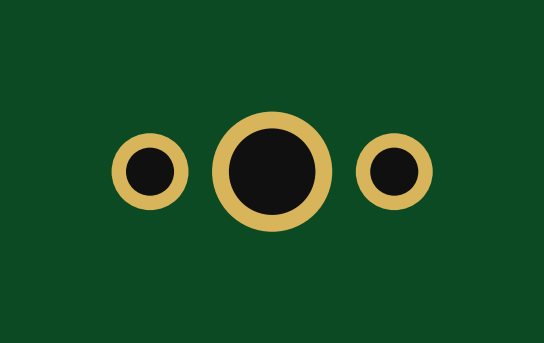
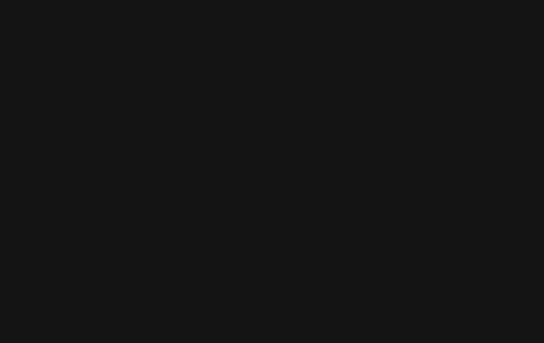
part: (272, 171) -> none

